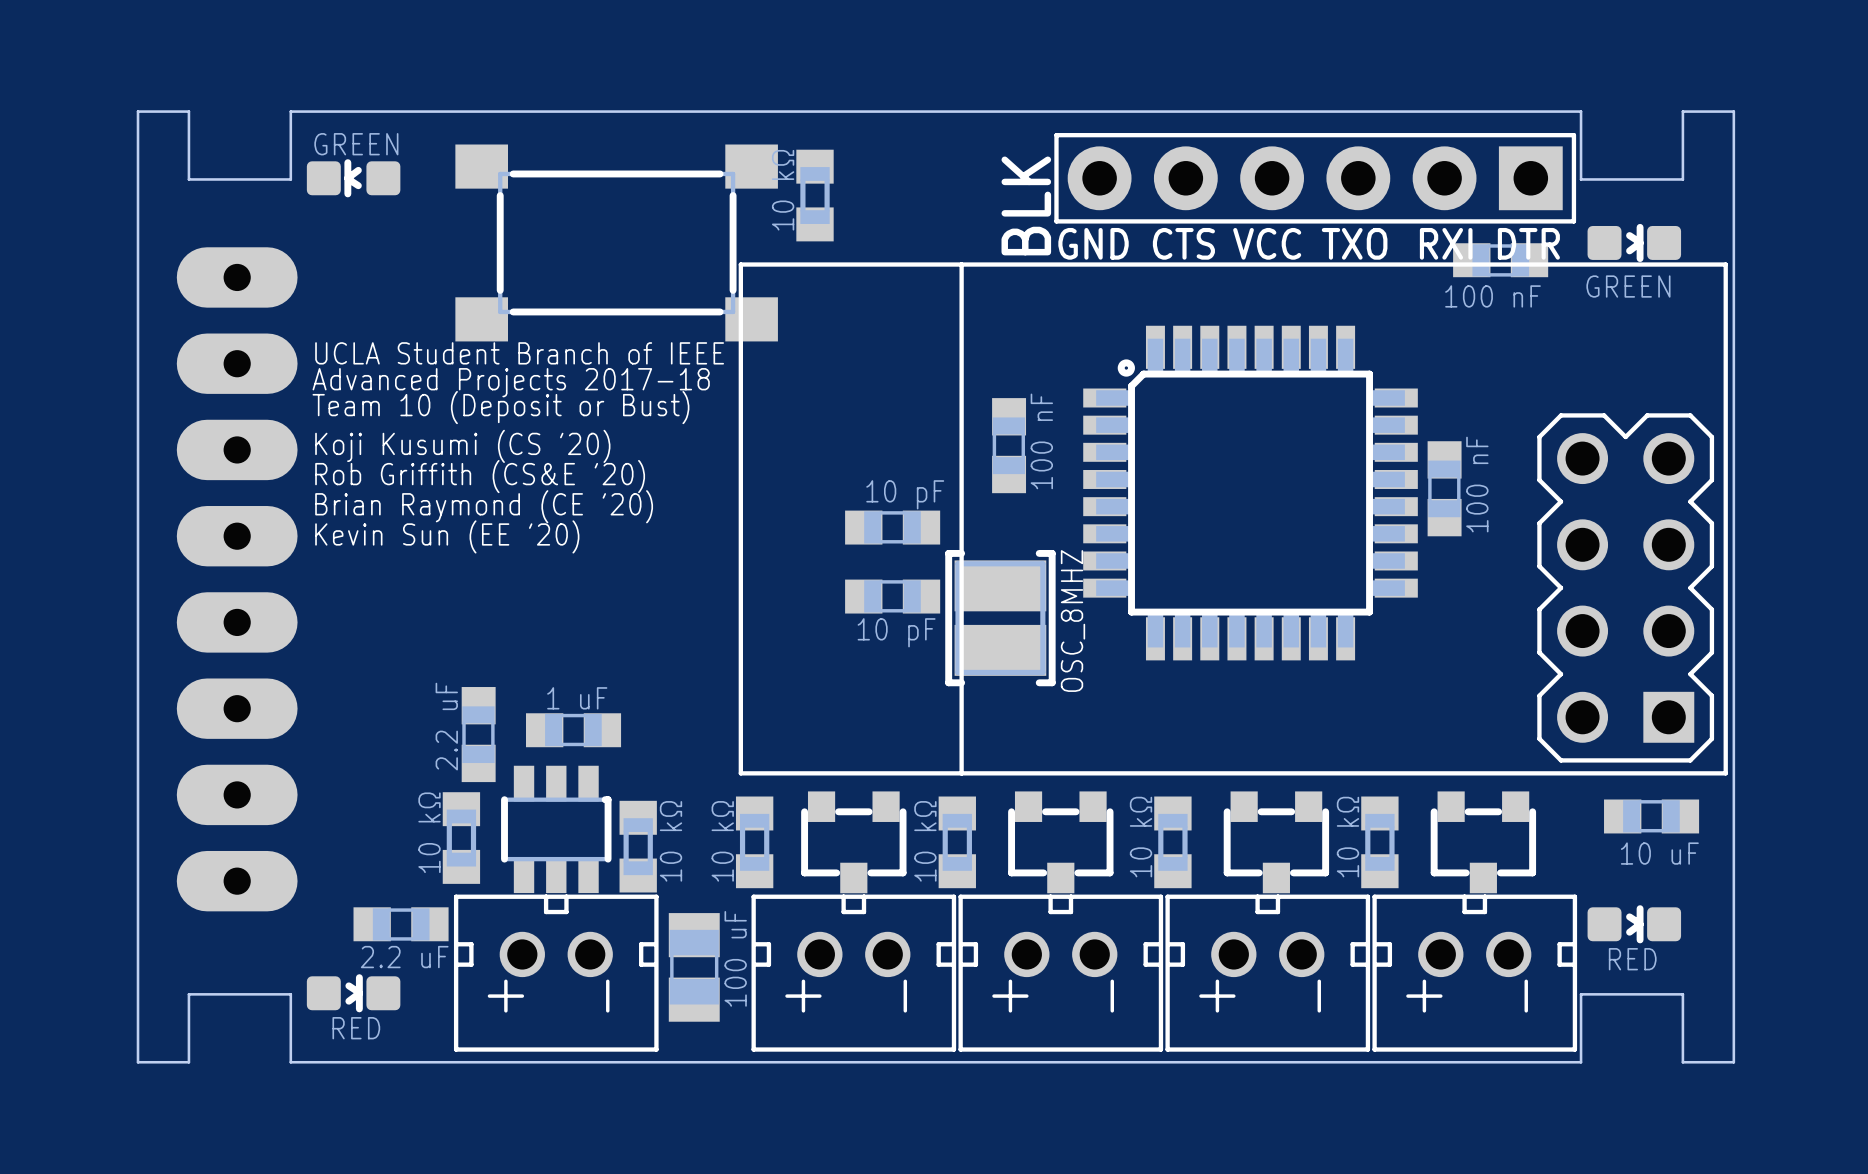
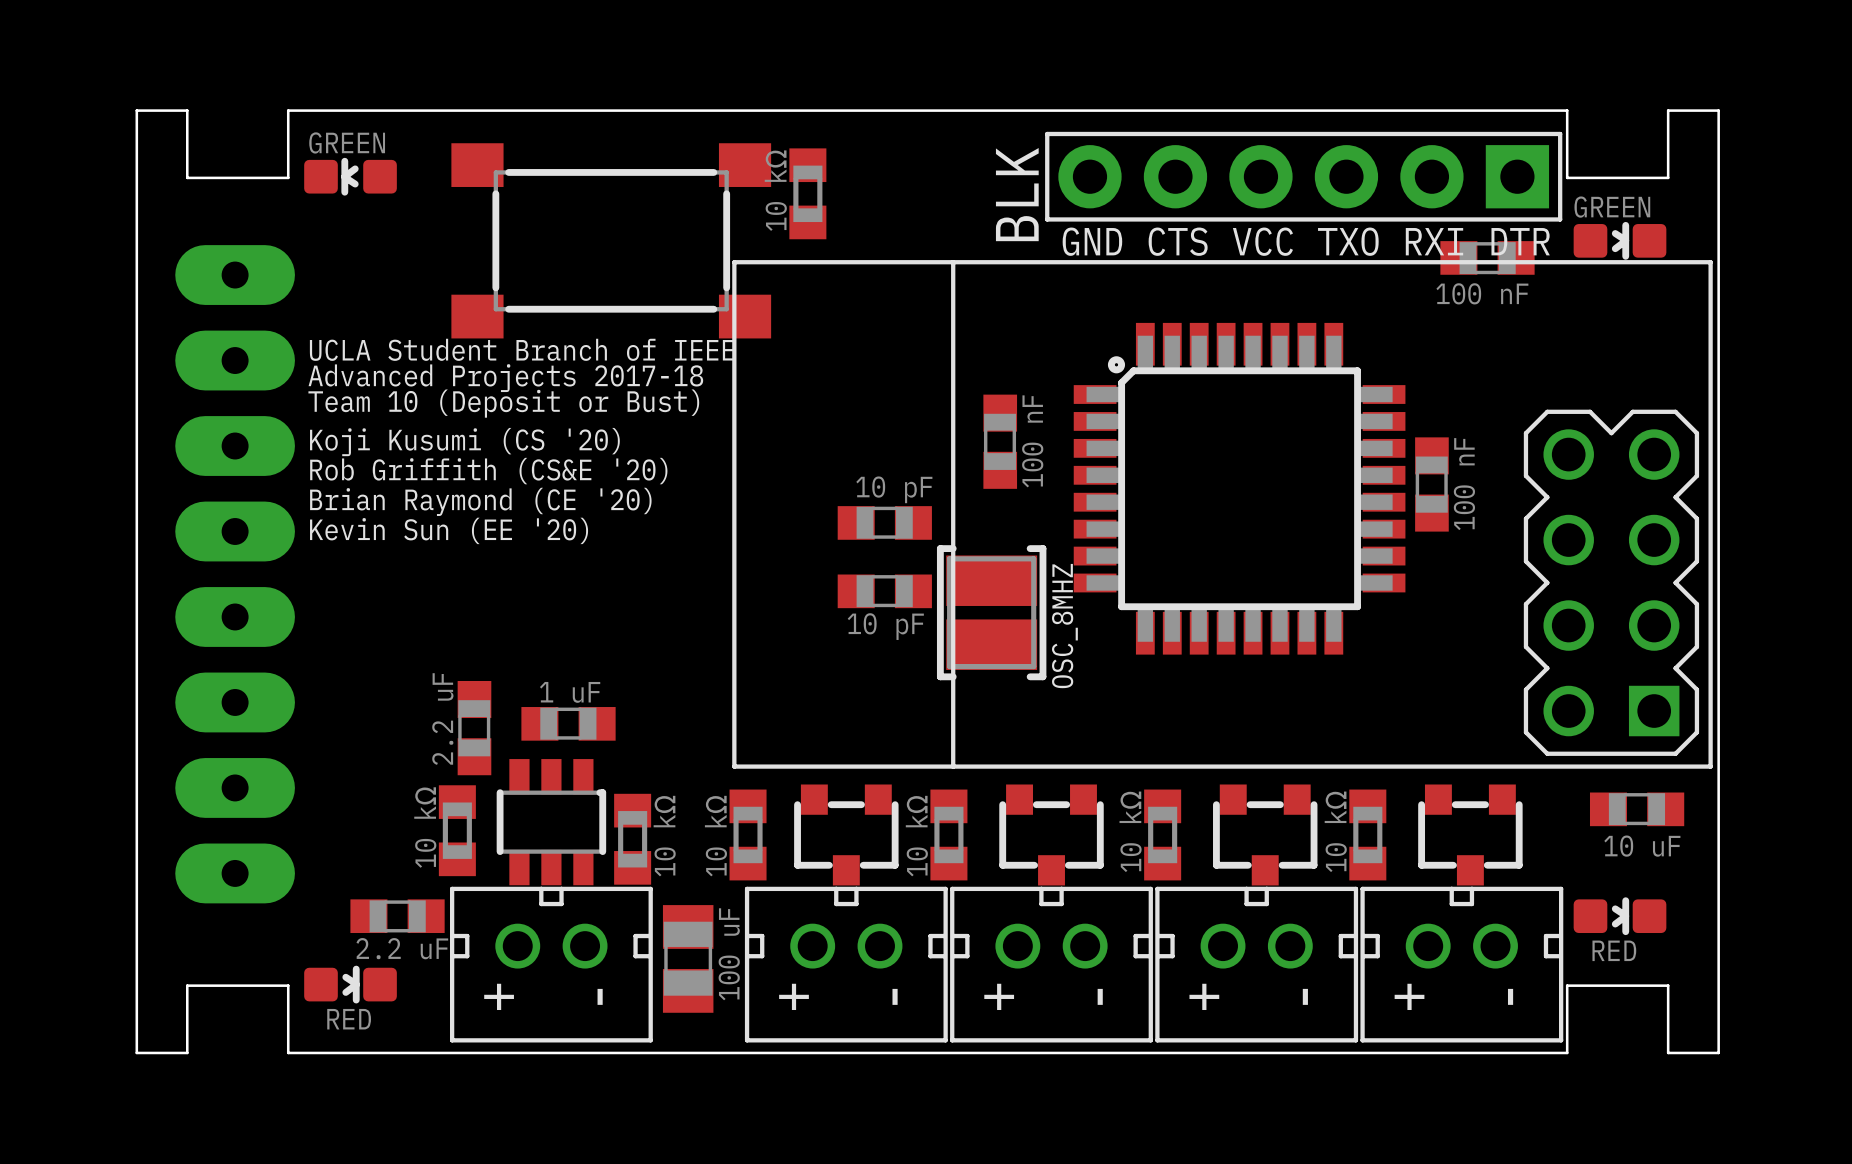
part value position: GREEN (1628, 286) -> GREEN (1612, 207)

